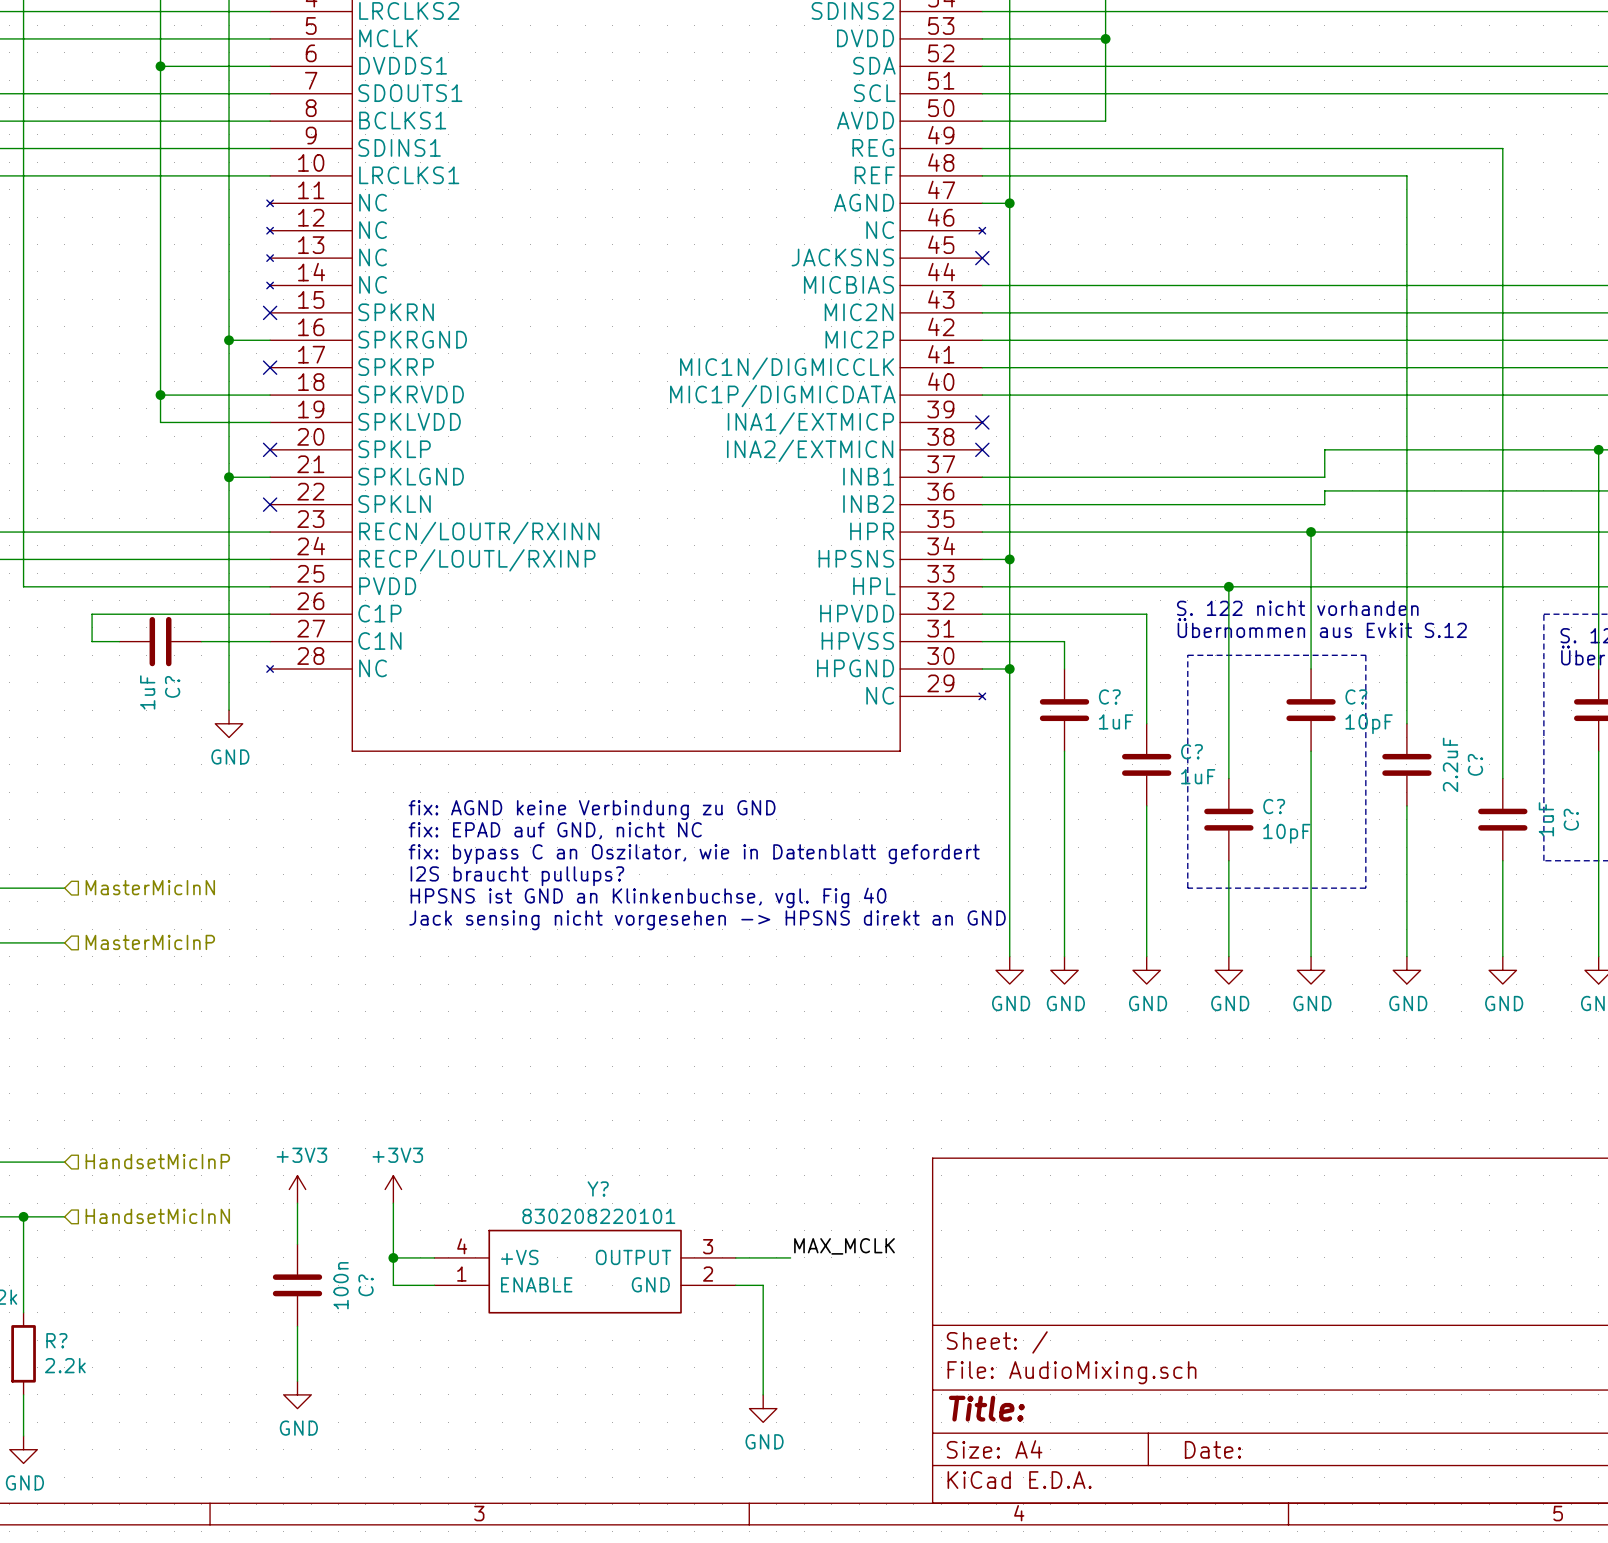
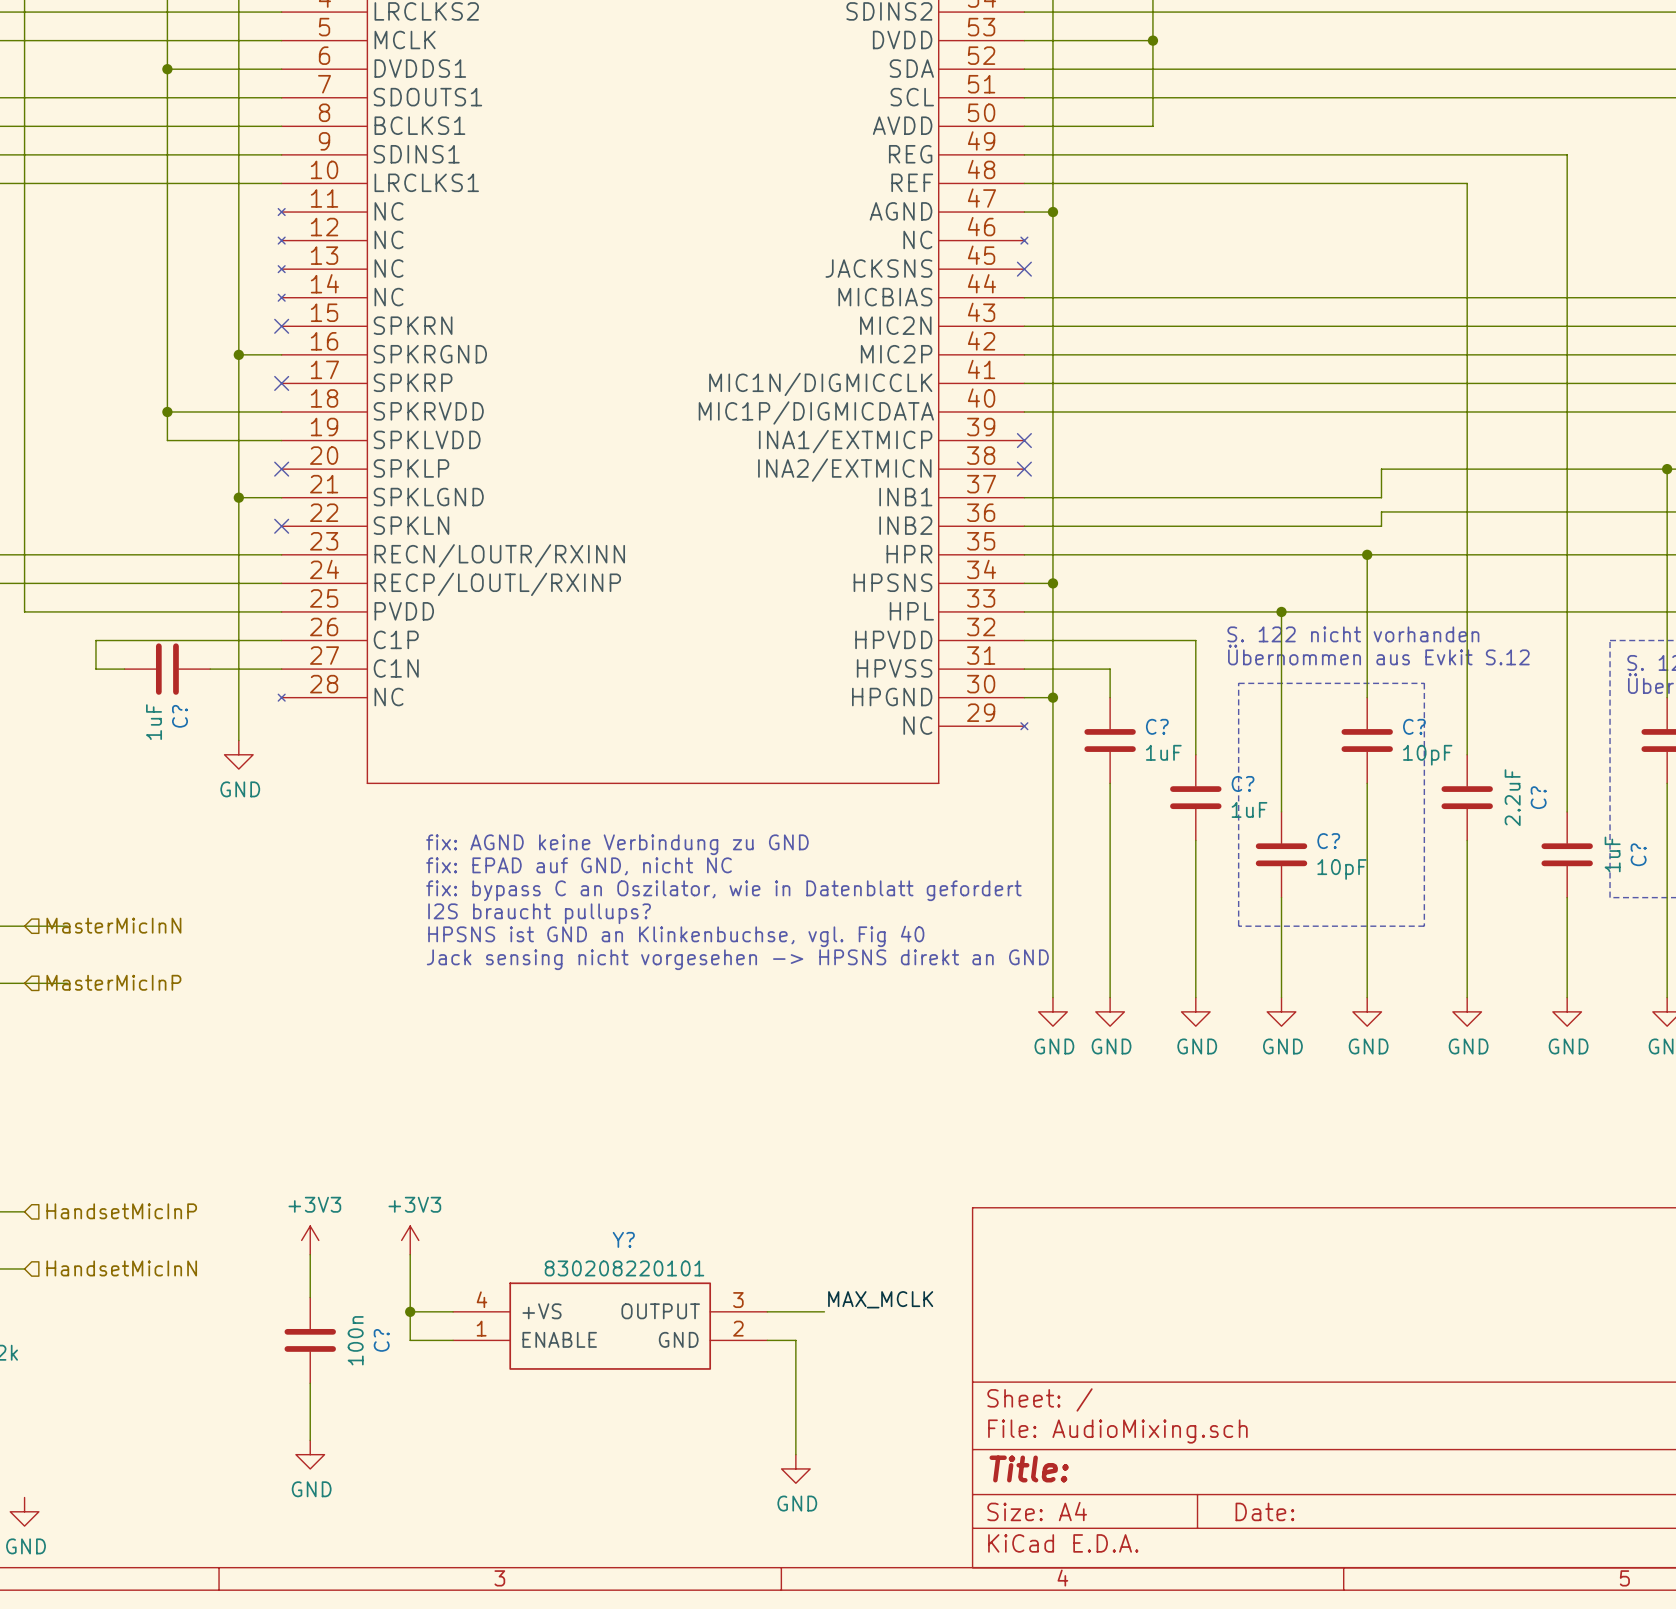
hierarchical label position: MasterMicInN (150, 887) -> MasterMicInN (113, 925)
hierarchical label position: MasterMicInP (150, 942) -> MasterMicInP (113, 982)
hierarchical label position: HandsetMicInP (157, 1161) -> HandsetMicInP (121, 1211)
wire: (23, 1162) (64, 1162) -> none
junction: (23, 1216) -> none
wire: (64, 1216) (23, 1216) (23, 1312) -> none
hierarchical label position: HandsetMicInN (157, 1216) -> HandsetMicInN (121, 1268)
R?: 2.2k (23, 1353) -> none
wire: (23, 1394) (23, 1436) -> none

